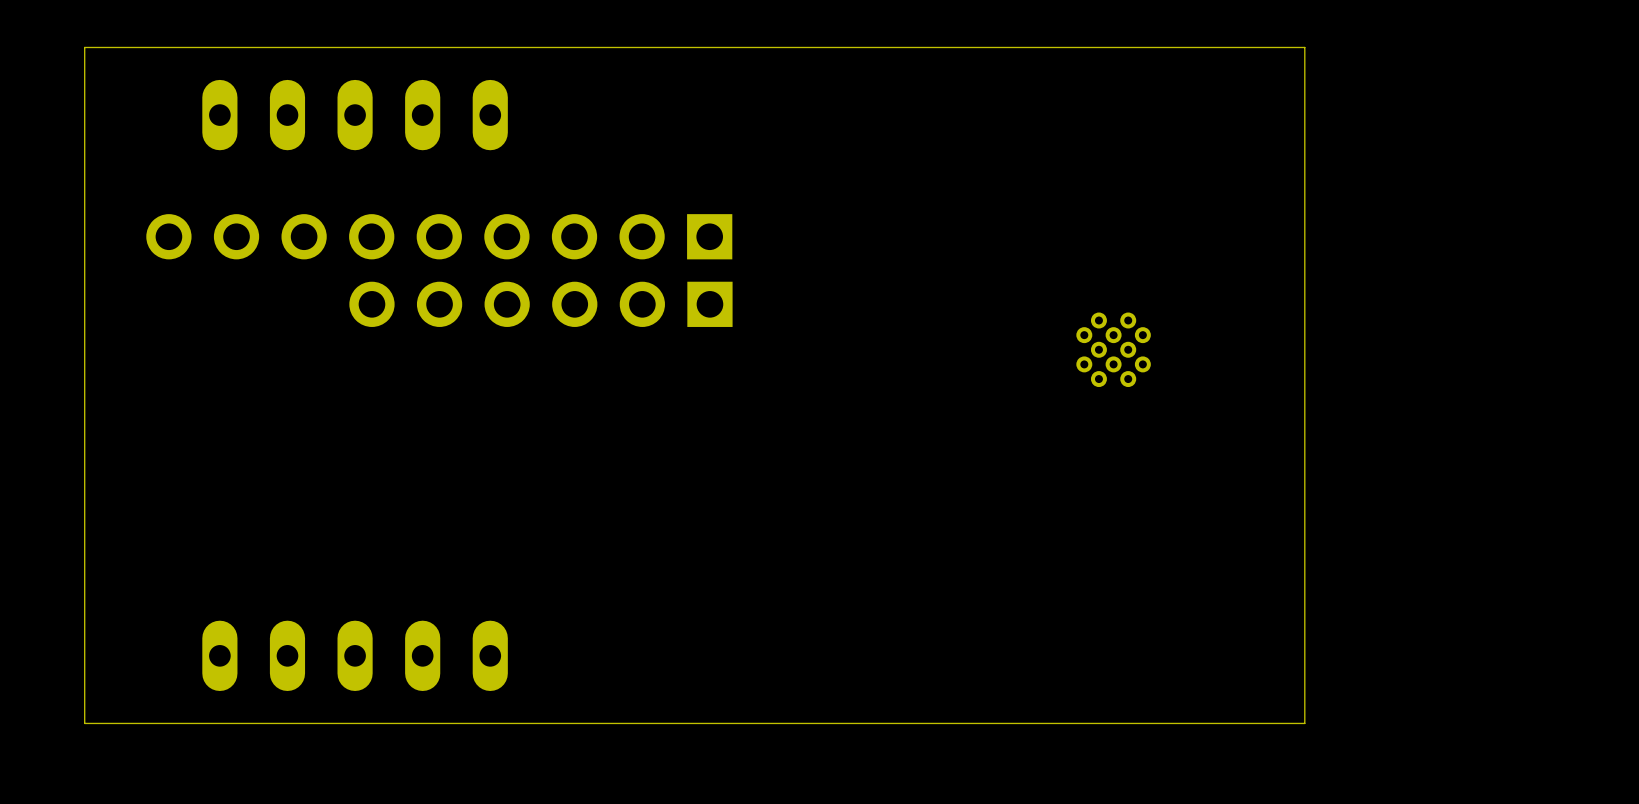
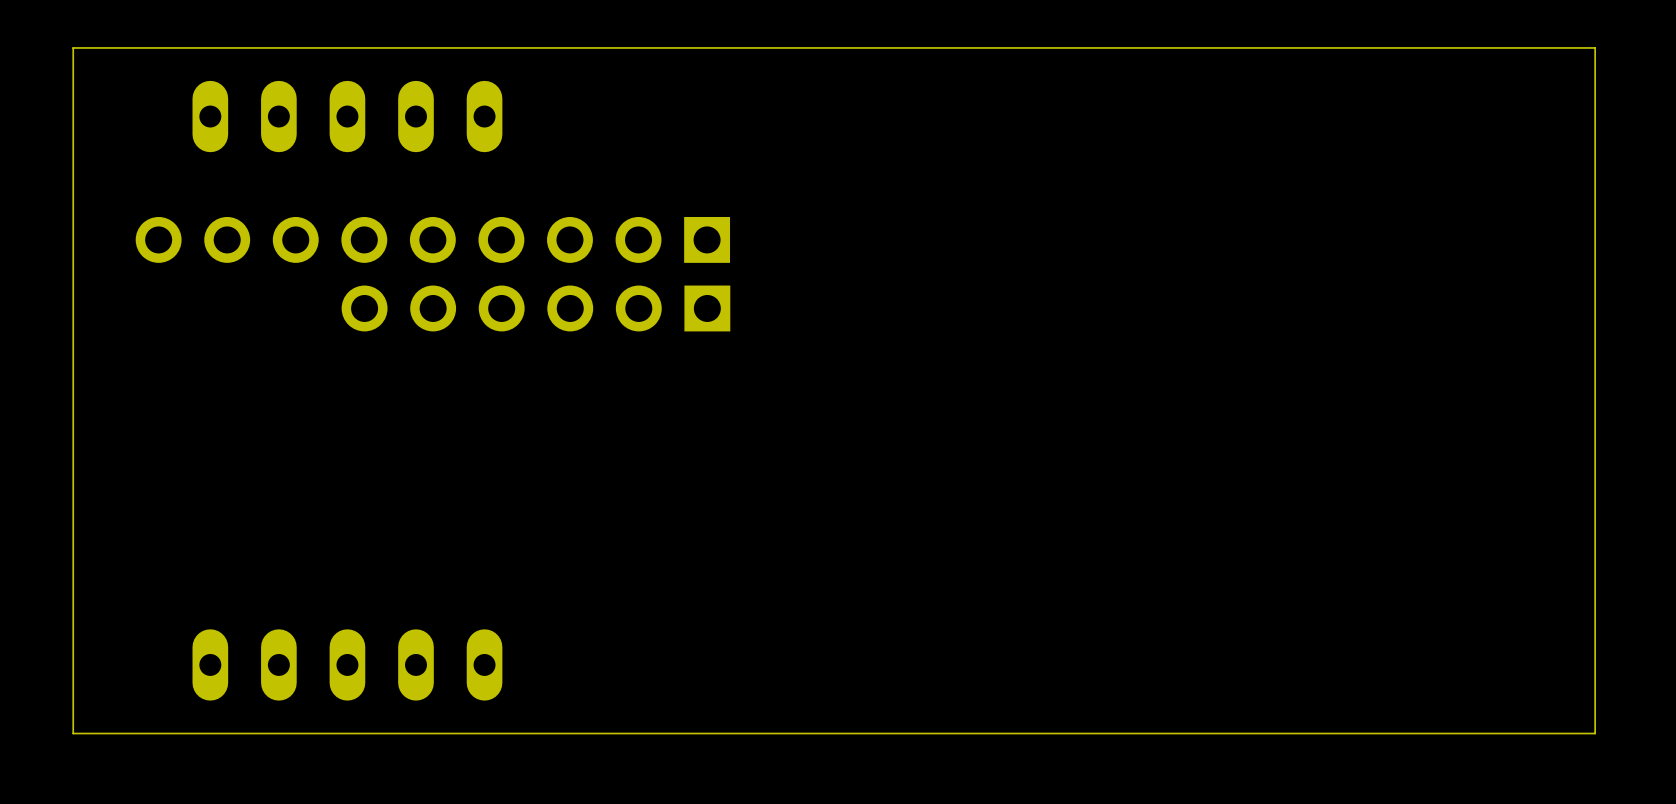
board edge: (1304, 47) (1304, 723) -> (1310, 47) (1595, 47) (1595, 733) (1310, 733)
part: (1113, 349) -> none

